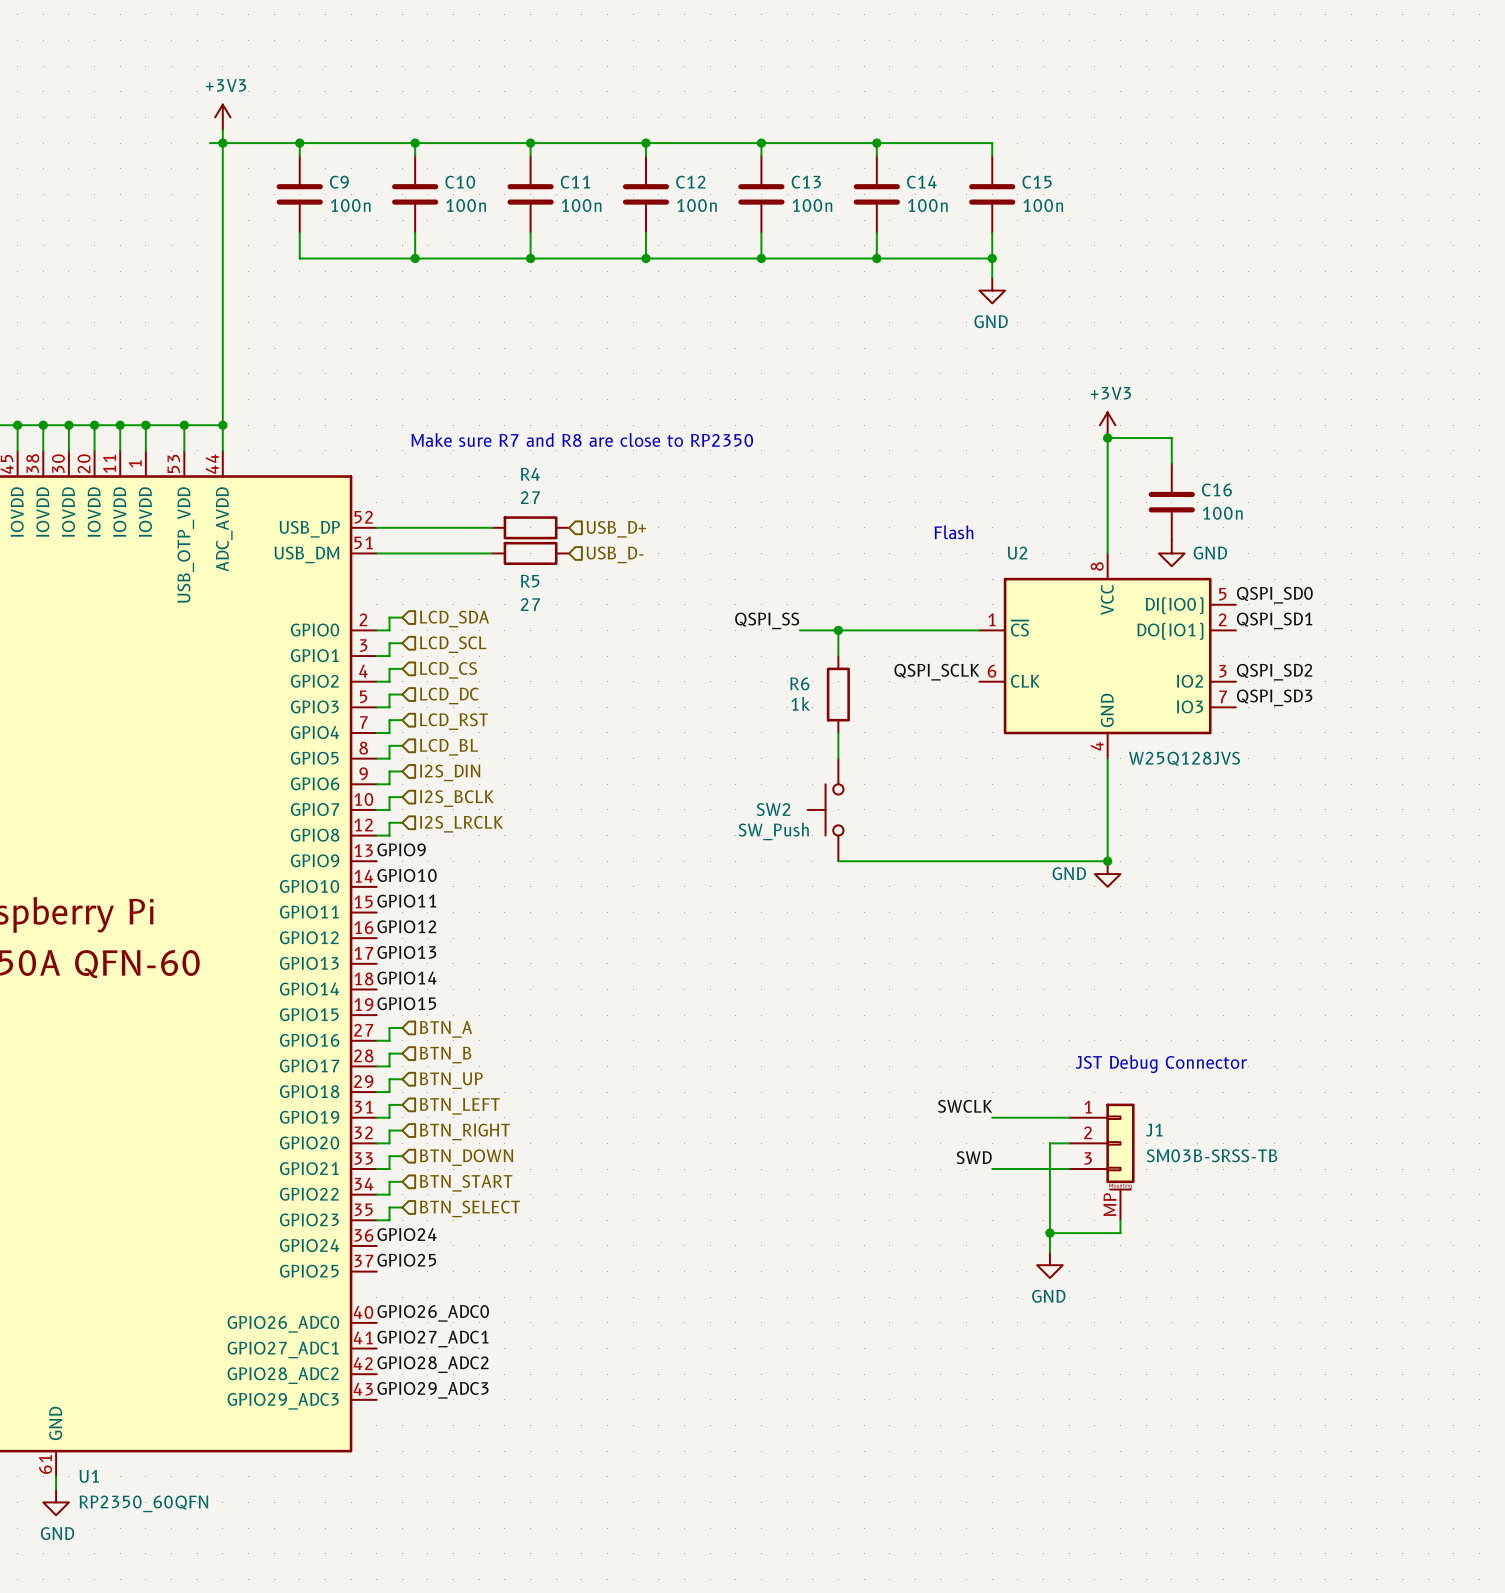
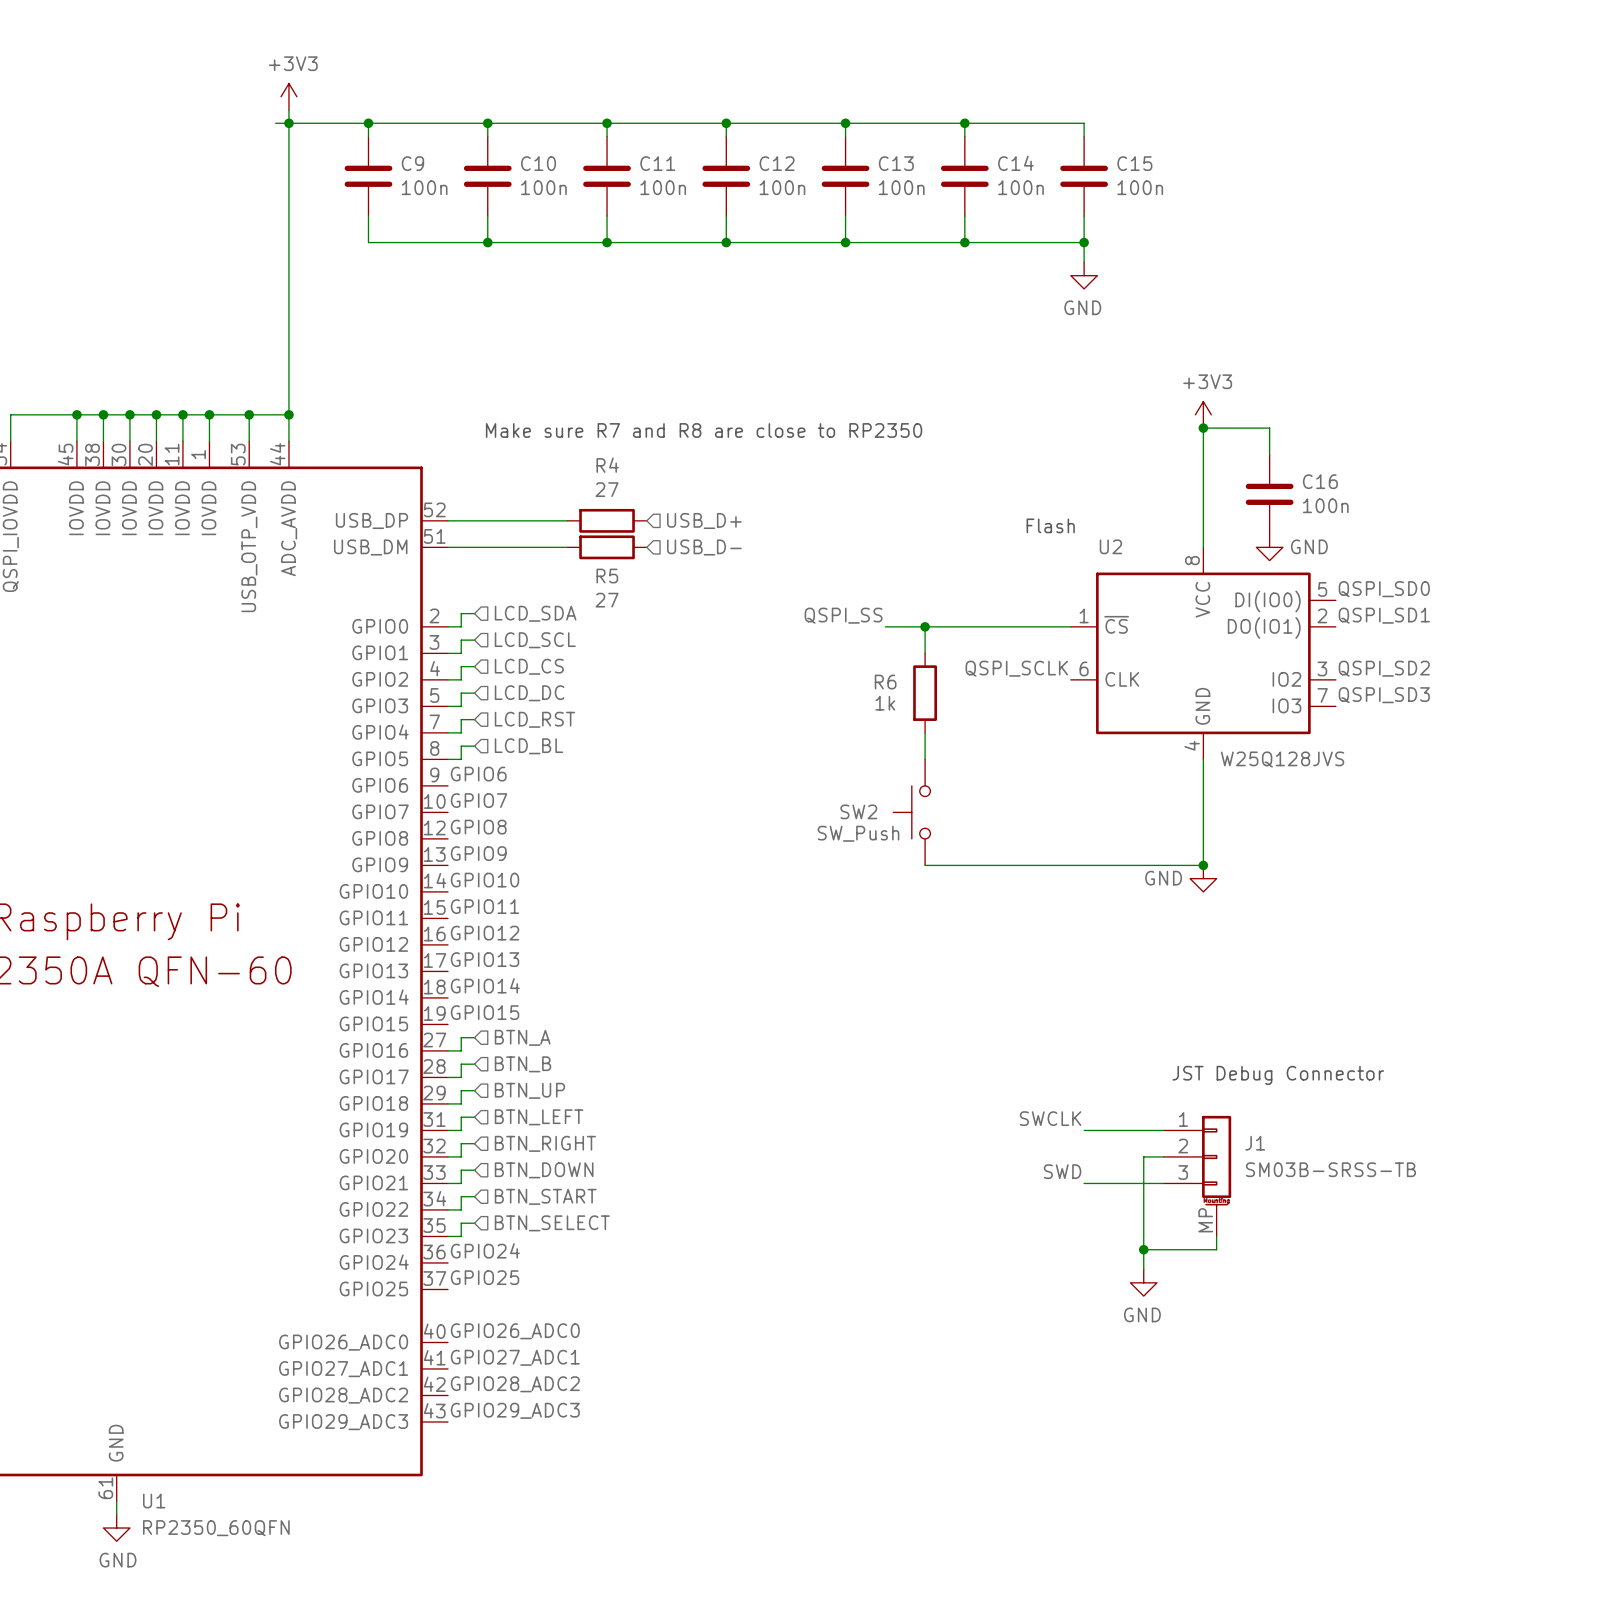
wire: (402, 771) (389, 771) (389, 784) (376, 784) -> none
label: none -> GPIO6 (478, 774)
hierarchical label: I2S_DIN (450, 772) -> none
wire: (402, 797) (389, 797) (389, 809) (376, 809) -> none
label: none -> GPIO7 (479, 800)
hierarchical label: I2S_BCLK (456, 798) -> none
wire: (402, 822) (389, 822) (389, 835) (376, 835) -> none
label: none -> GPIO8 (478, 827)
hierarchical label: I2S_LRCLK (461, 824) -> none

